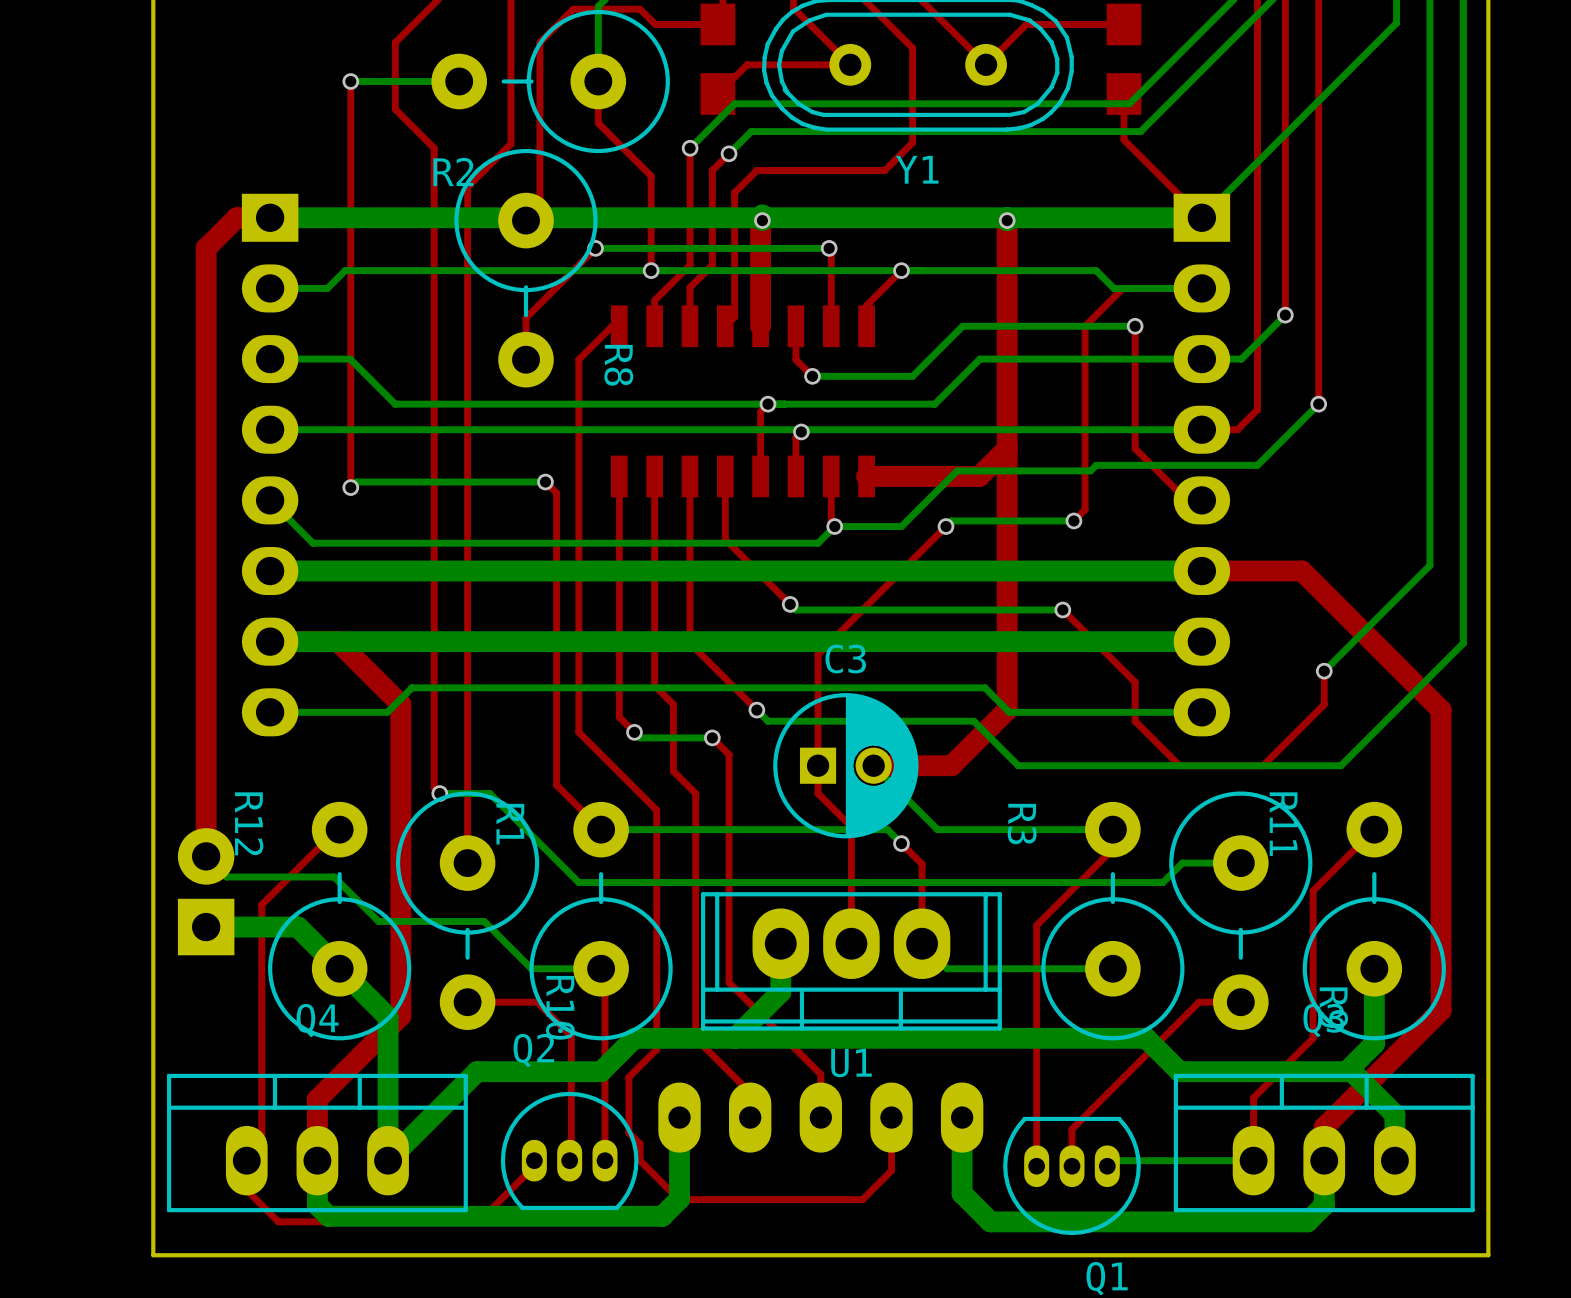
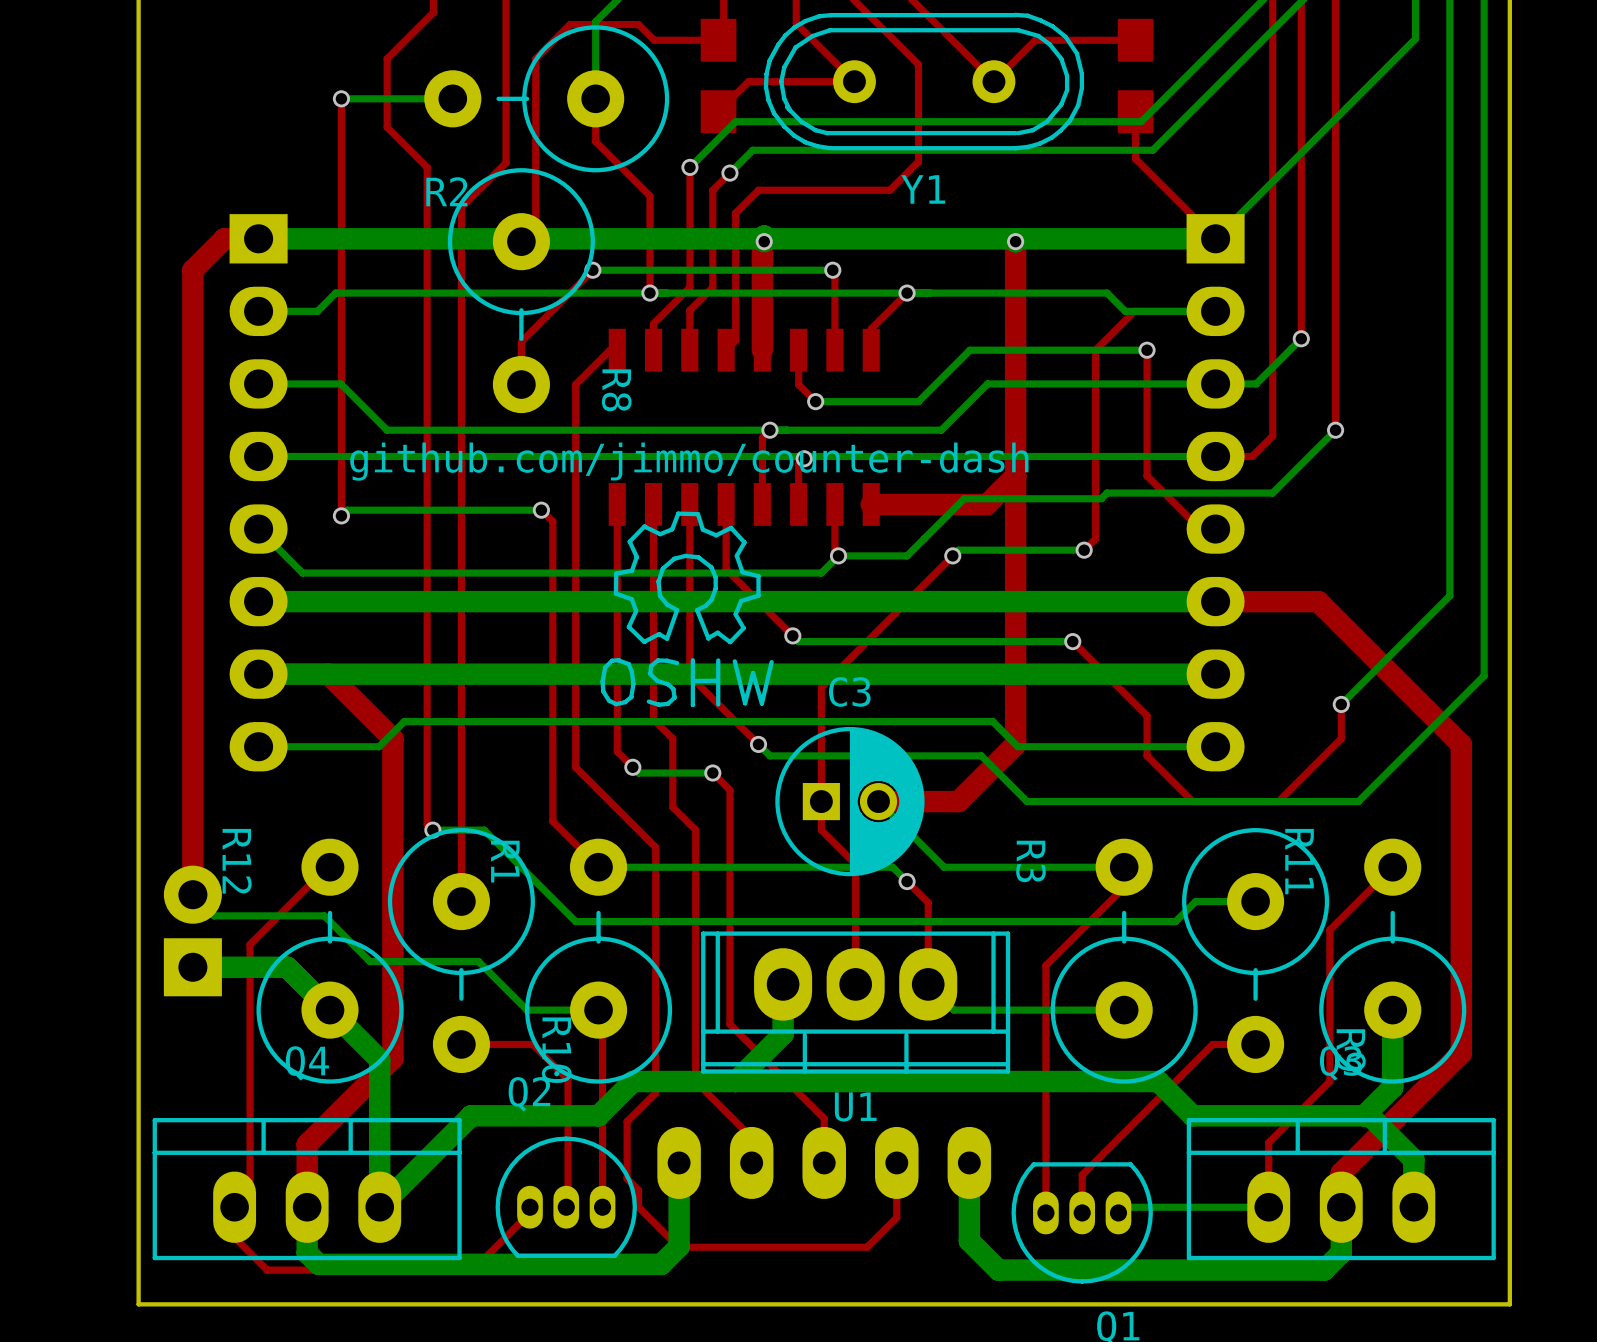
github.com/jimmo/counter-dash: none -> (687, 609)

